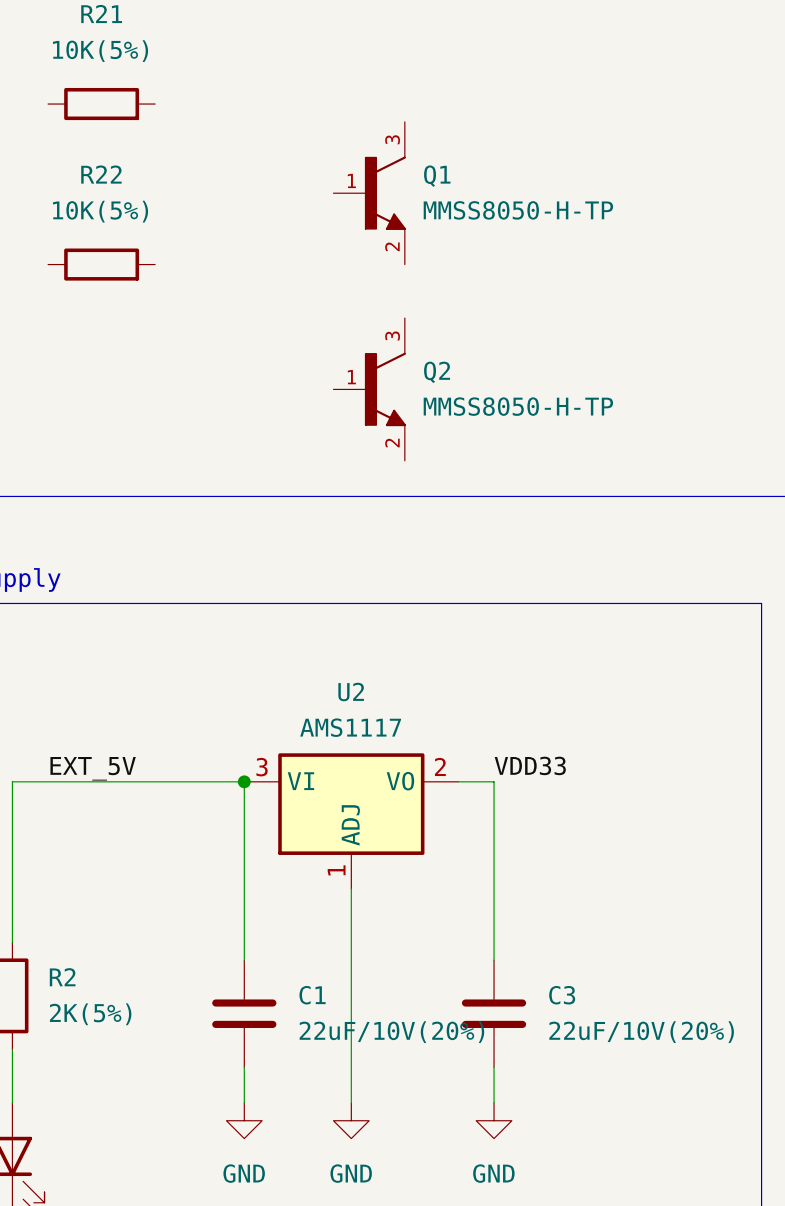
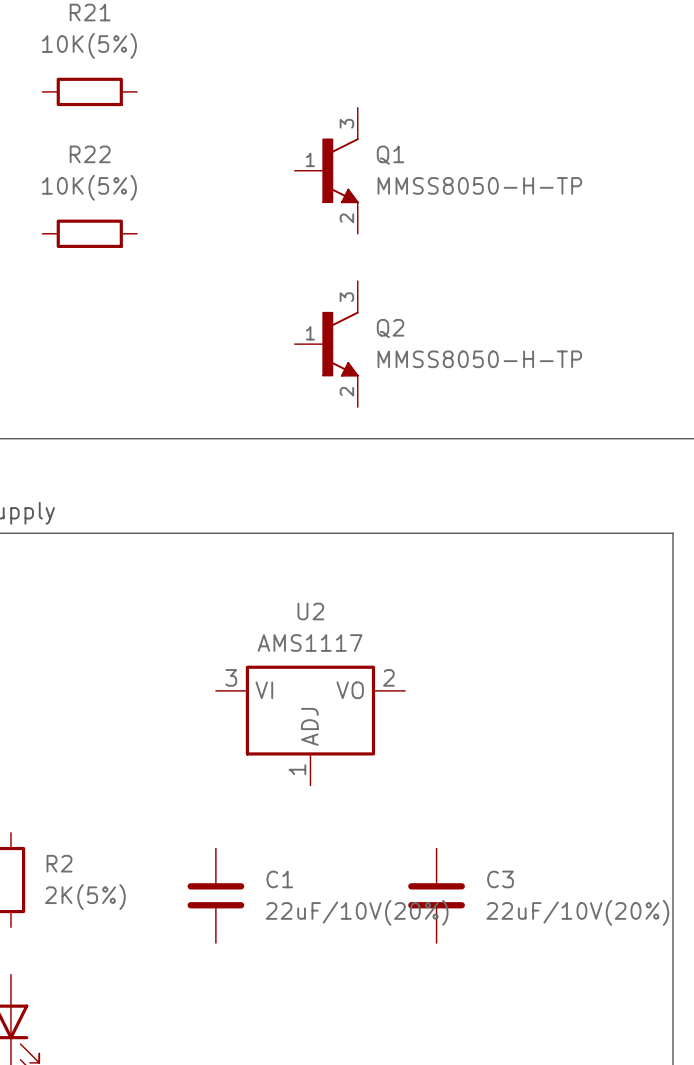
label: VDD33 (530, 765) -> none
label: EXT_5V (93, 768) -> none
junction: (244, 781) -> none
wire: (458, 781) (494, 781) (494, 960) -> none
wire: (351, 888) (351, 1102) -> none
wire: (12, 942) (12, 781) (244, 781) (244, 960) -> none
wire: (12, 1049) (12, 1102) -> none
wire: (244, 1067) (244, 1102) -> none
wire: (494, 1067) (494, 1102) -> none
power symbol: GND (244, 1120) -> none
power symbol: GND (351, 1120) -> none
power symbol: GND (494, 1120) -> none

